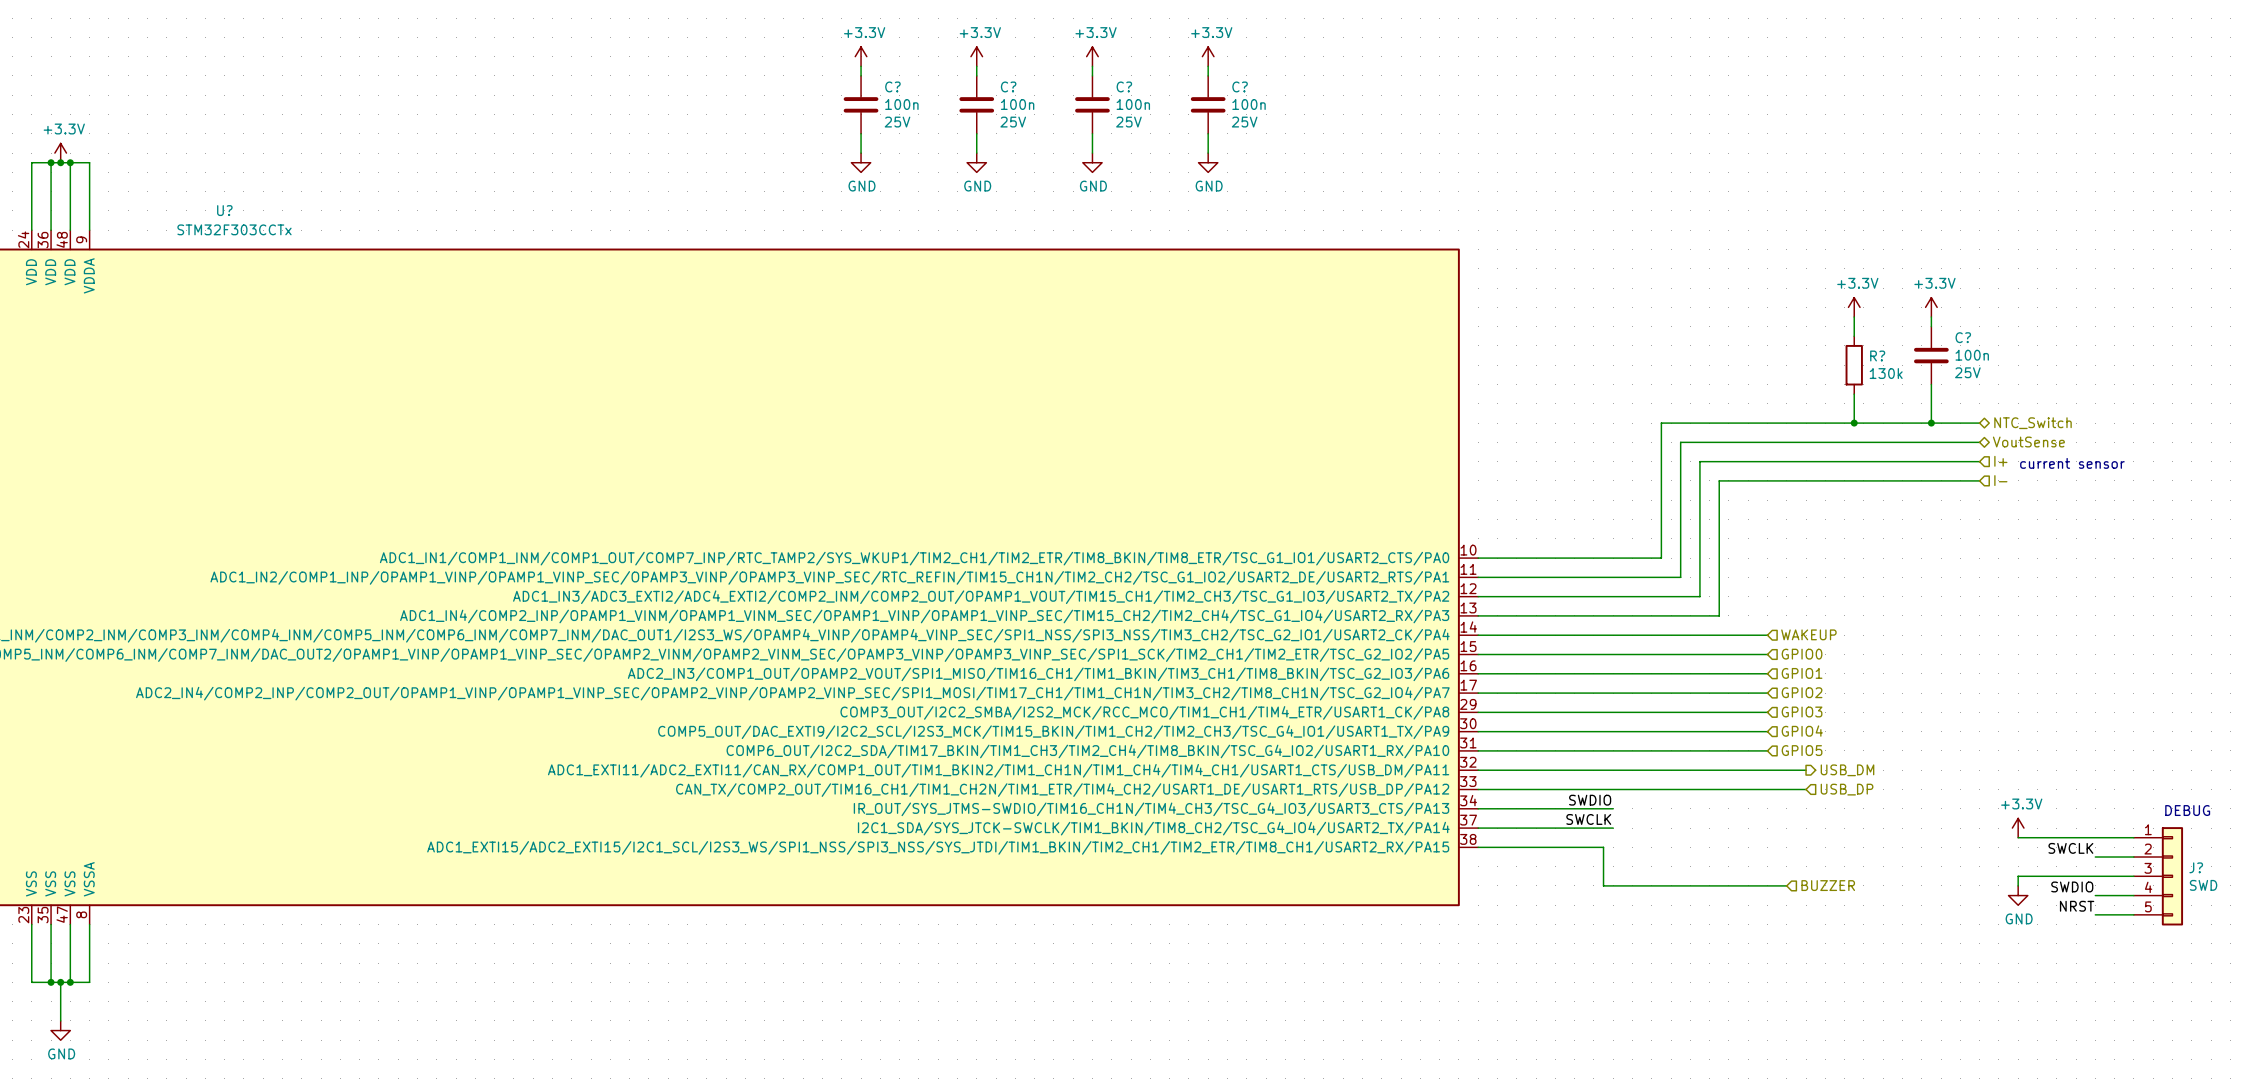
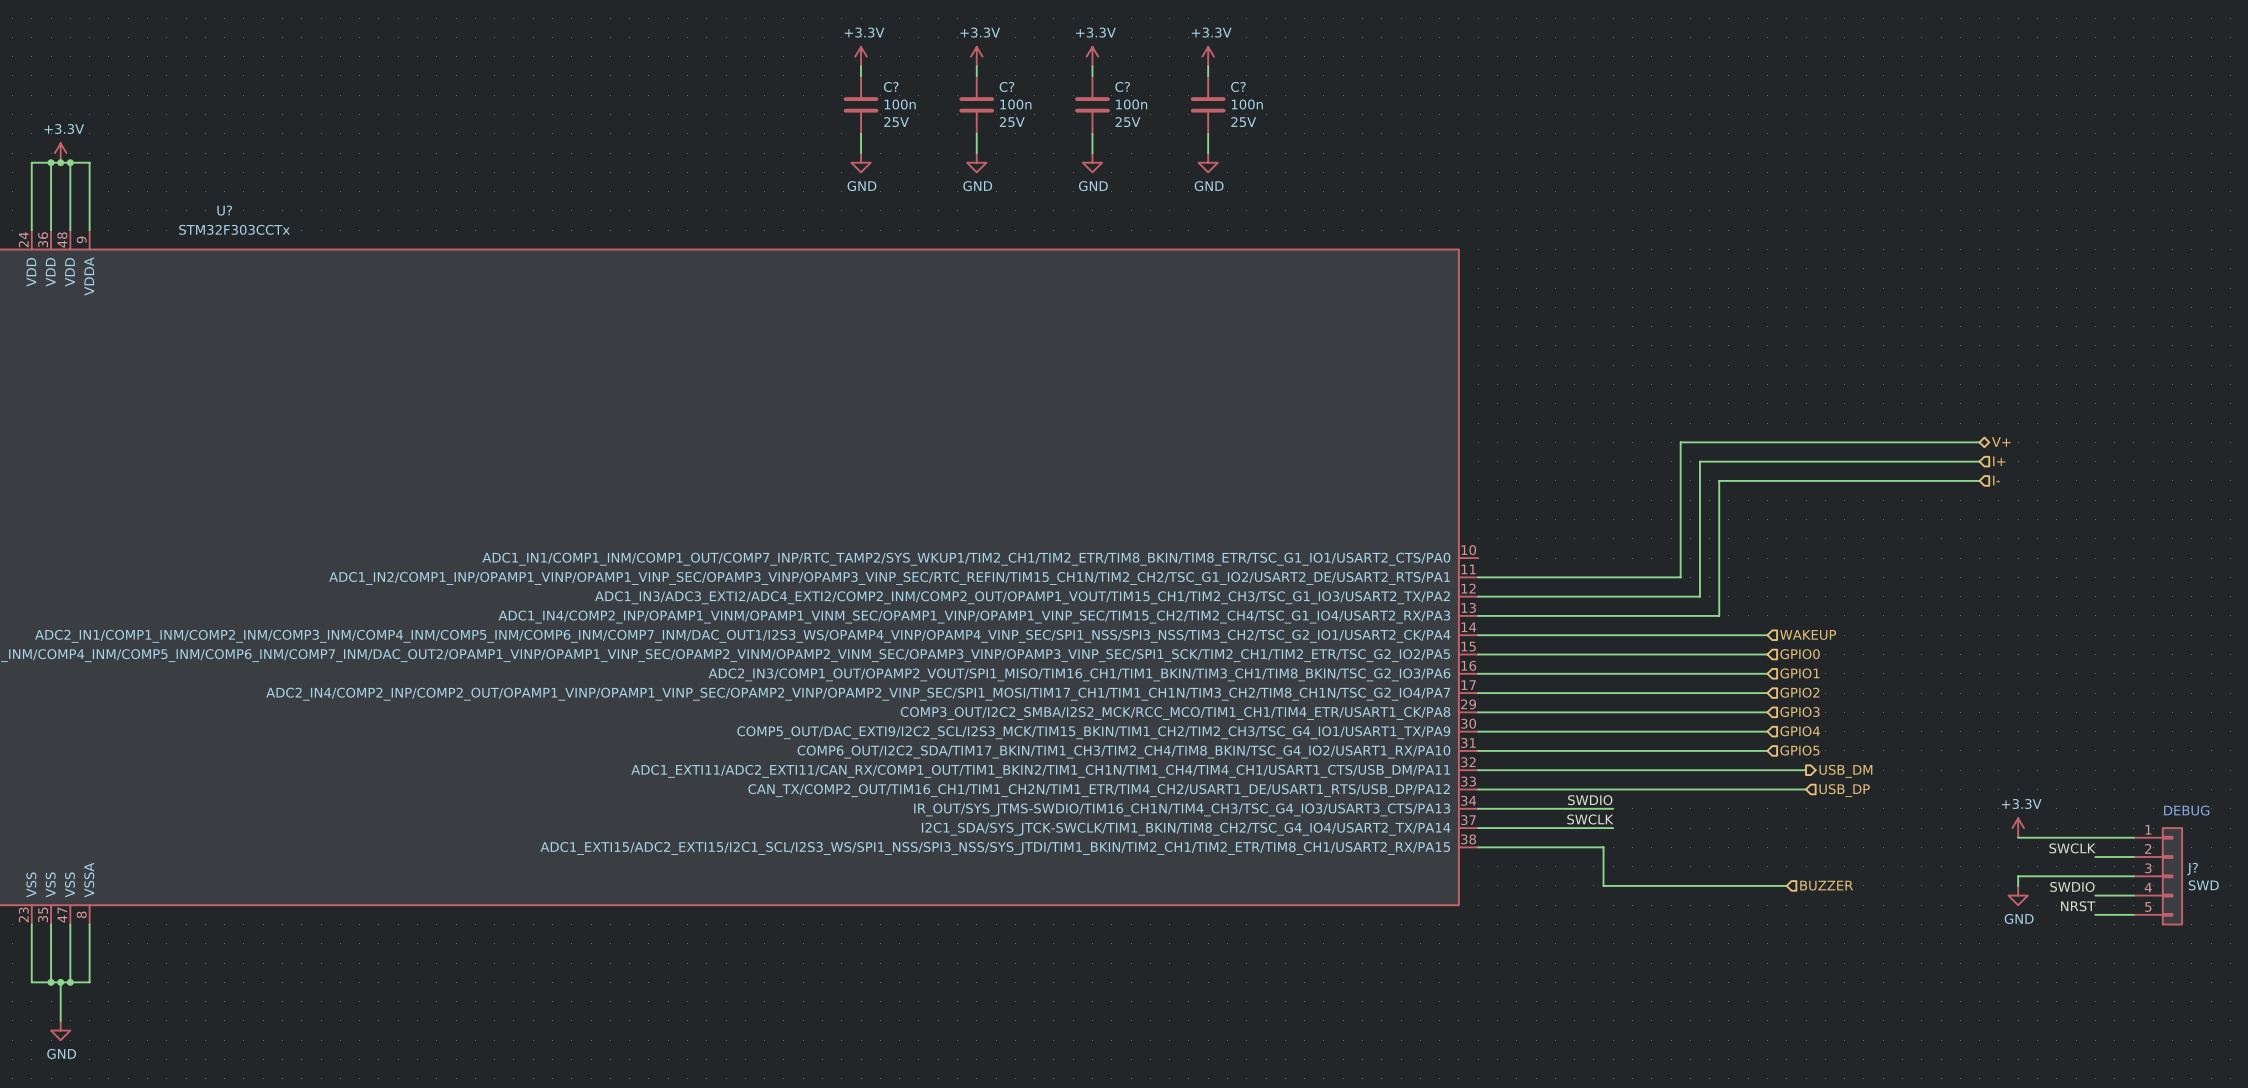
power symbol: +3.3V (1854, 307) -> none
power symbol: +3.3V (1931, 307) -> none
wire: (1854, 317) (1854, 336) -> none
wire: (1931, 317) (1931, 326) -> none
C?: 100n (1931, 355) -> none
R?: 130k (1854, 365) -> none
wire: (1931, 384) (1931, 423) -> none
wire: (1854, 394) (1854, 423) -> none
junction: (1854, 423) -> none
junction: (1931, 423) -> none
wire: (1979, 423) (1661, 423) (1661, 558) (1478, 558) -> none
hierarchical label: NTC_Switch (2033, 423) -> none
hierarchical label: VoutSense (2028, 442) -> V+ (2001, 442)
text: current sensor (2072, 463) -> none

